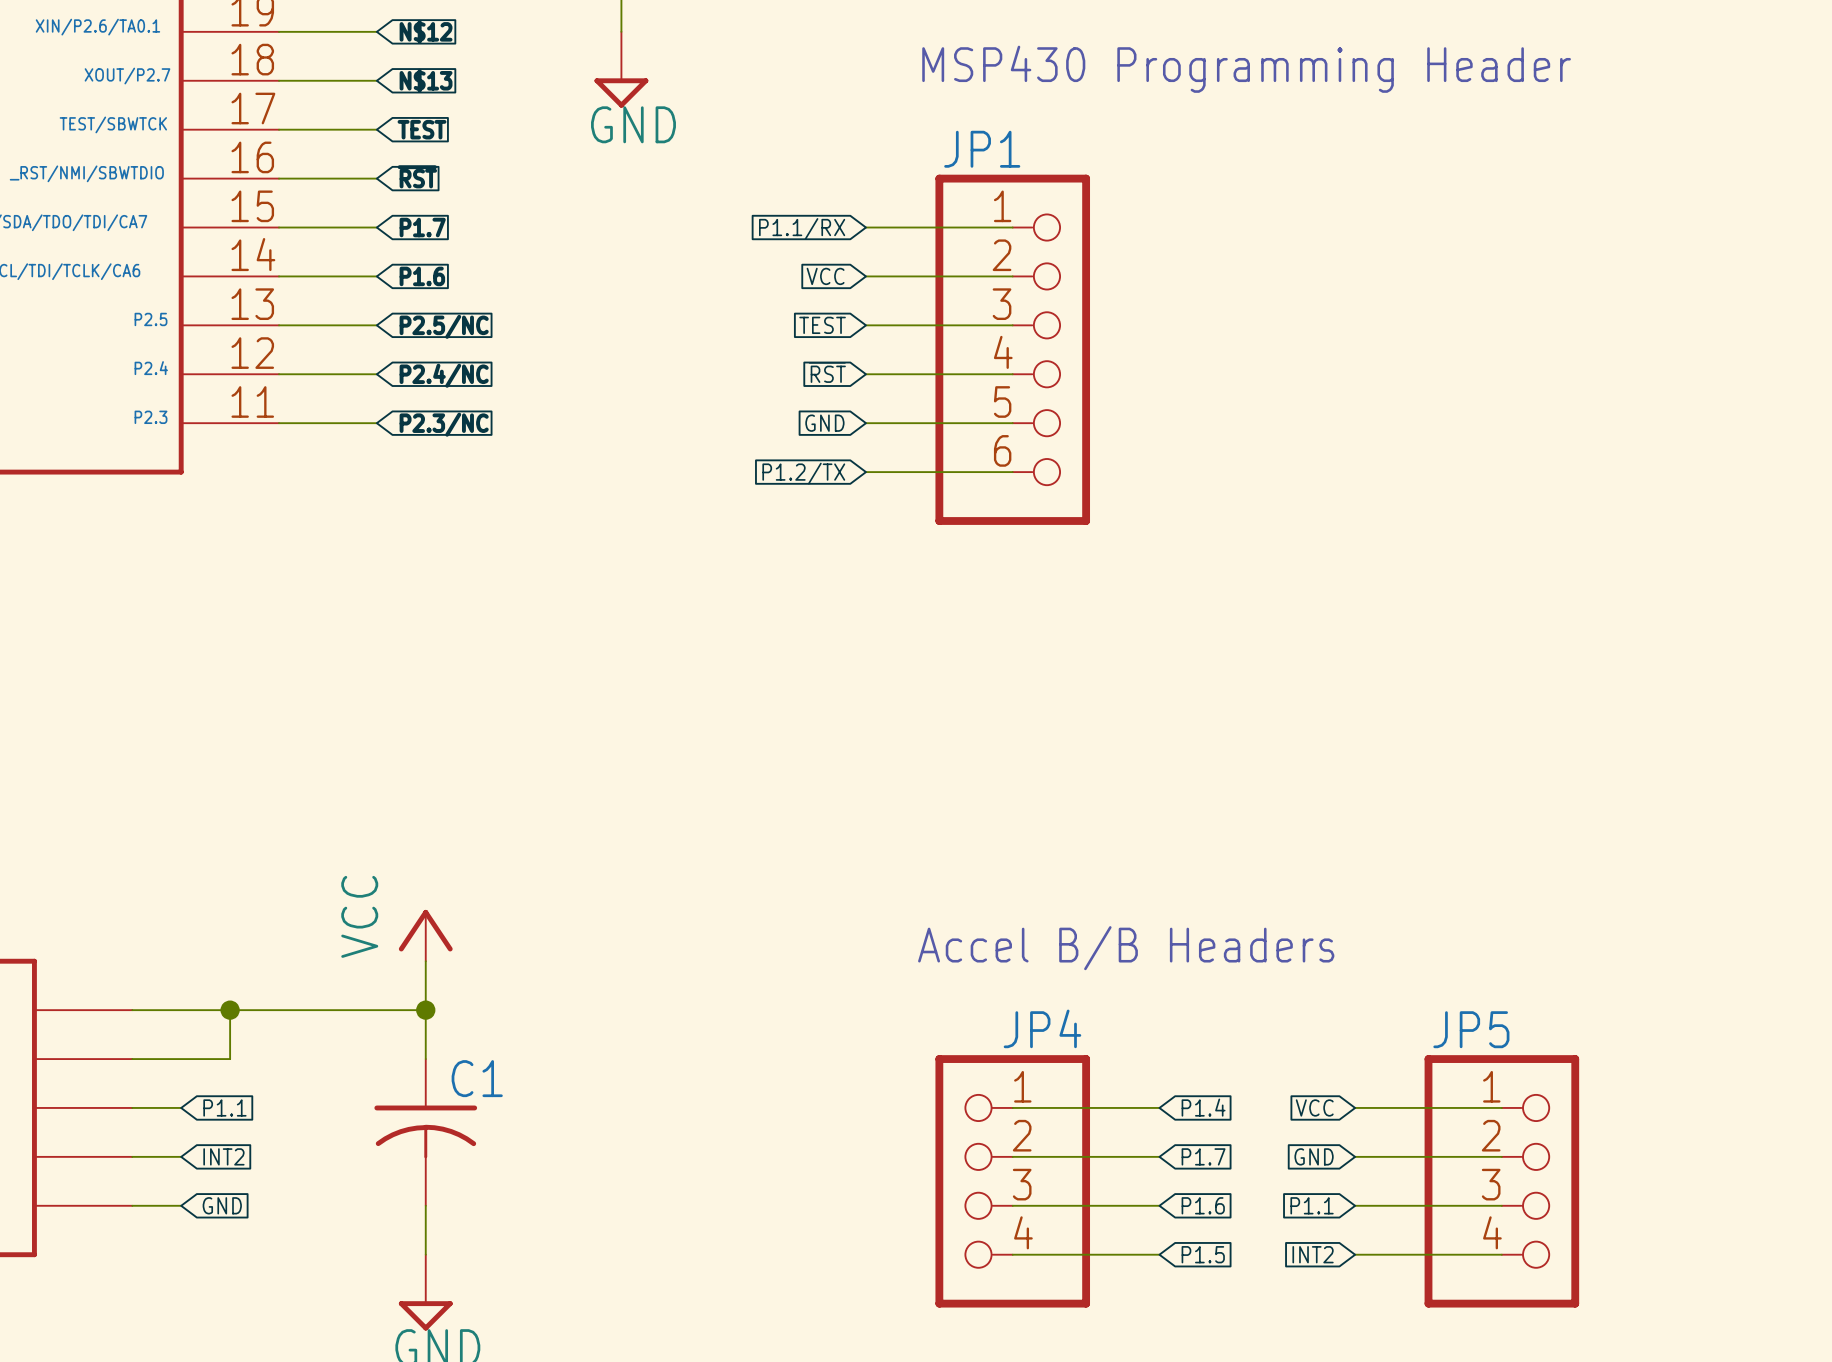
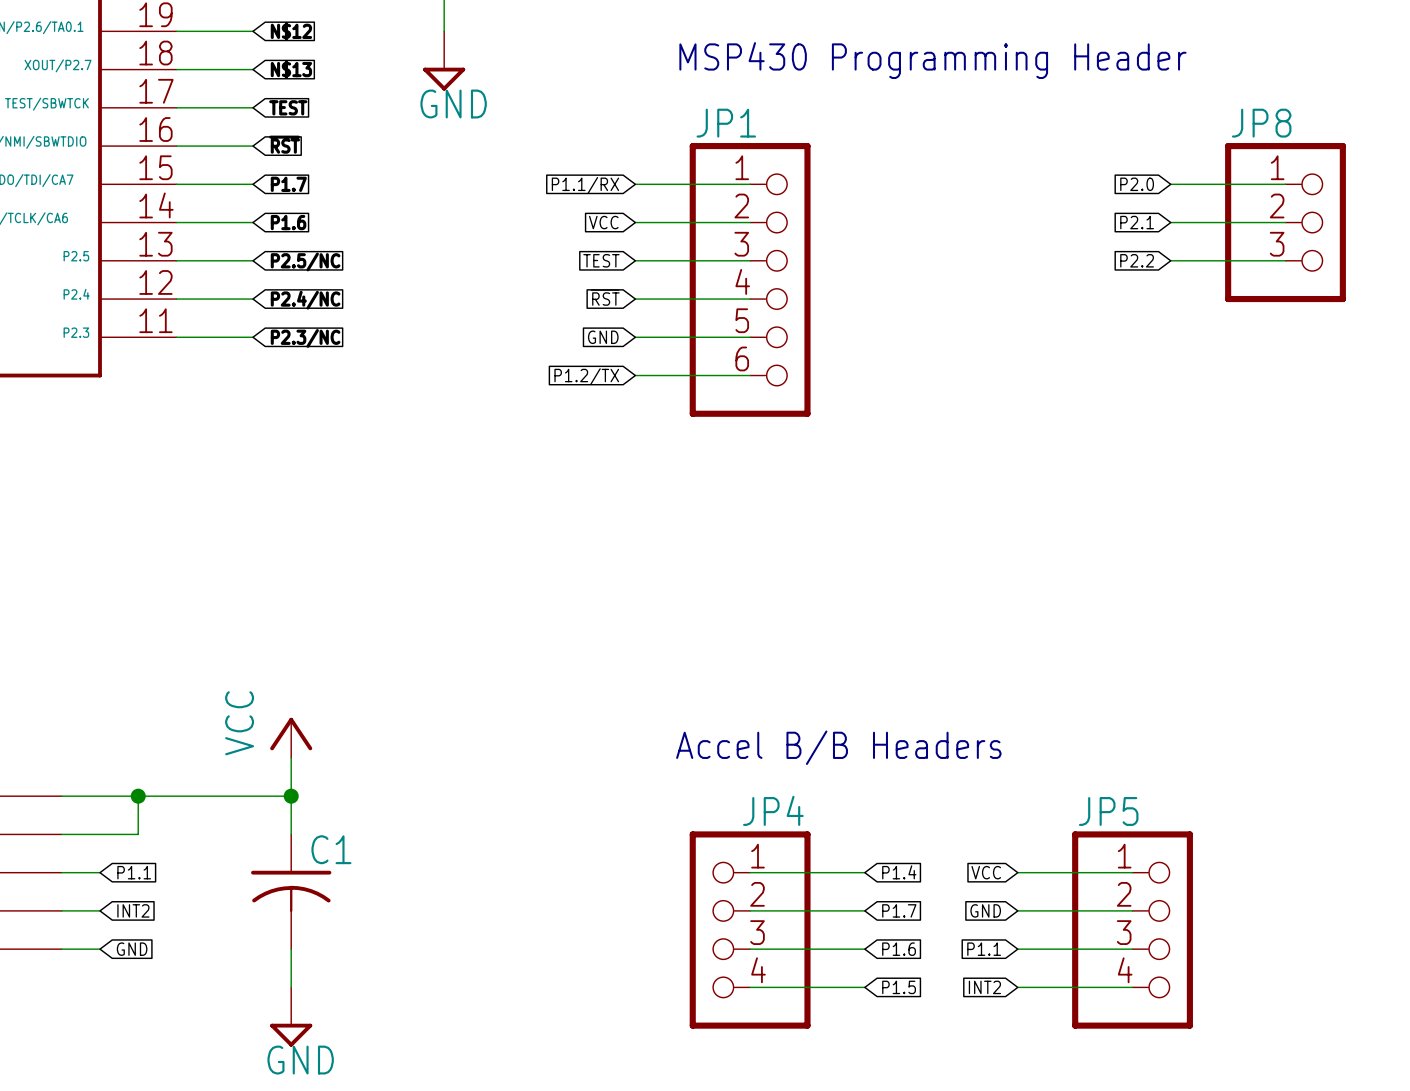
global label: none -> P2.0 (1137, 184)
wire: none -> (1170, 184) (1285, 184)
global label: none -> P2.1 (1137, 222)
wire: none -> (1170, 222) (1285, 222)
JP8: none -> (1285, 222)
global label: none -> P2.2 (1137, 260)
wire: none -> (1170, 260) (1285, 260)

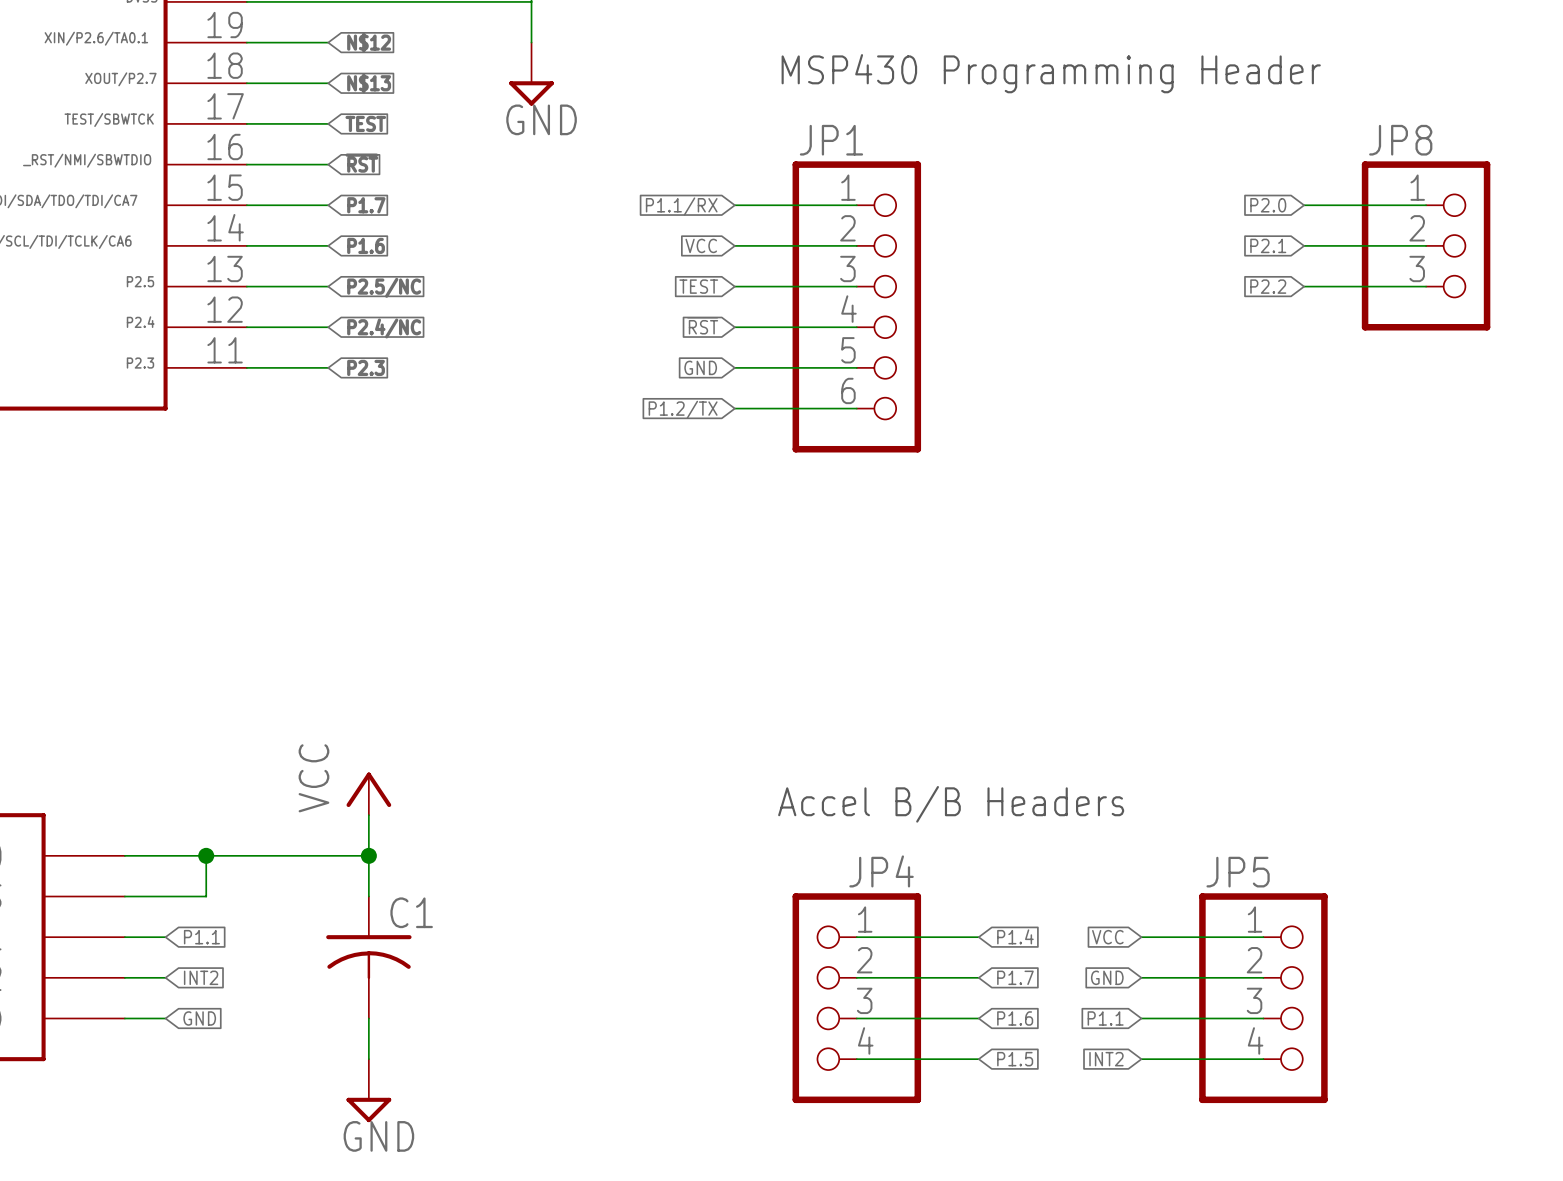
global label: P2.3/NC (305, 338) -> P2.3 (366, 367)

